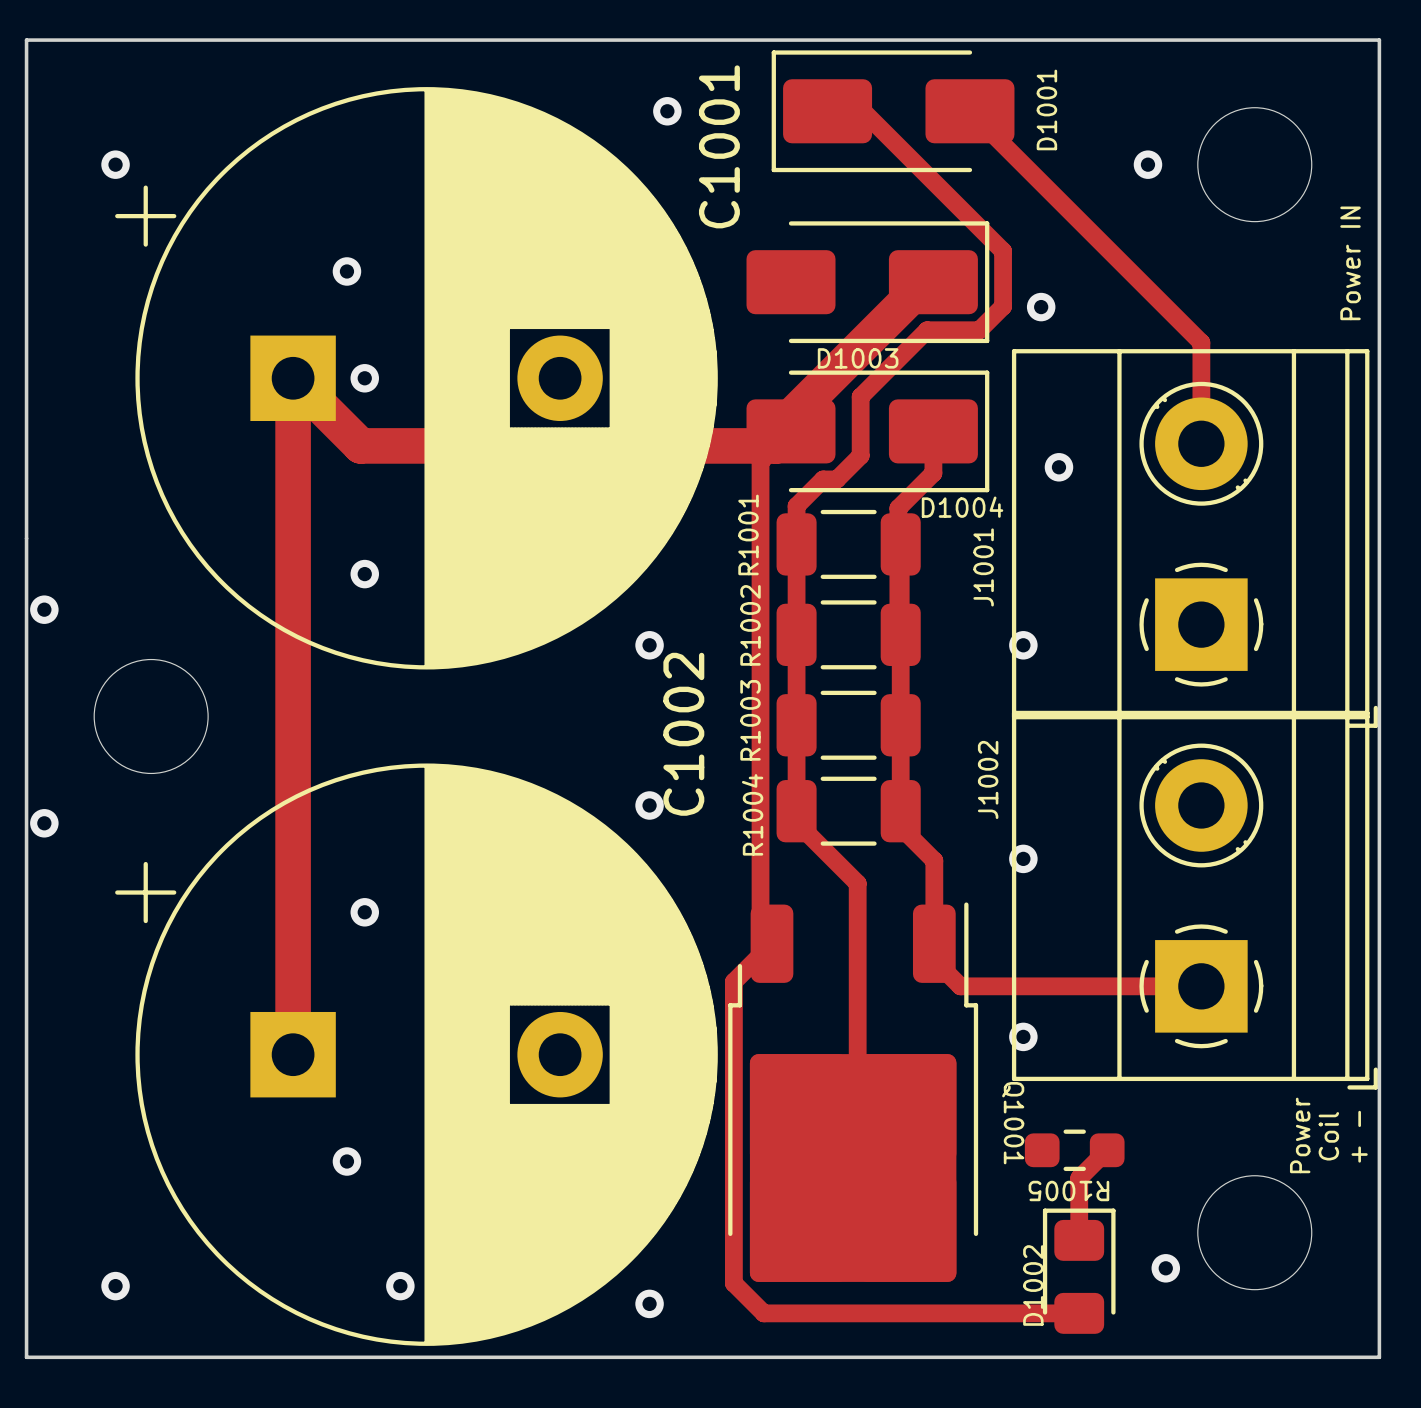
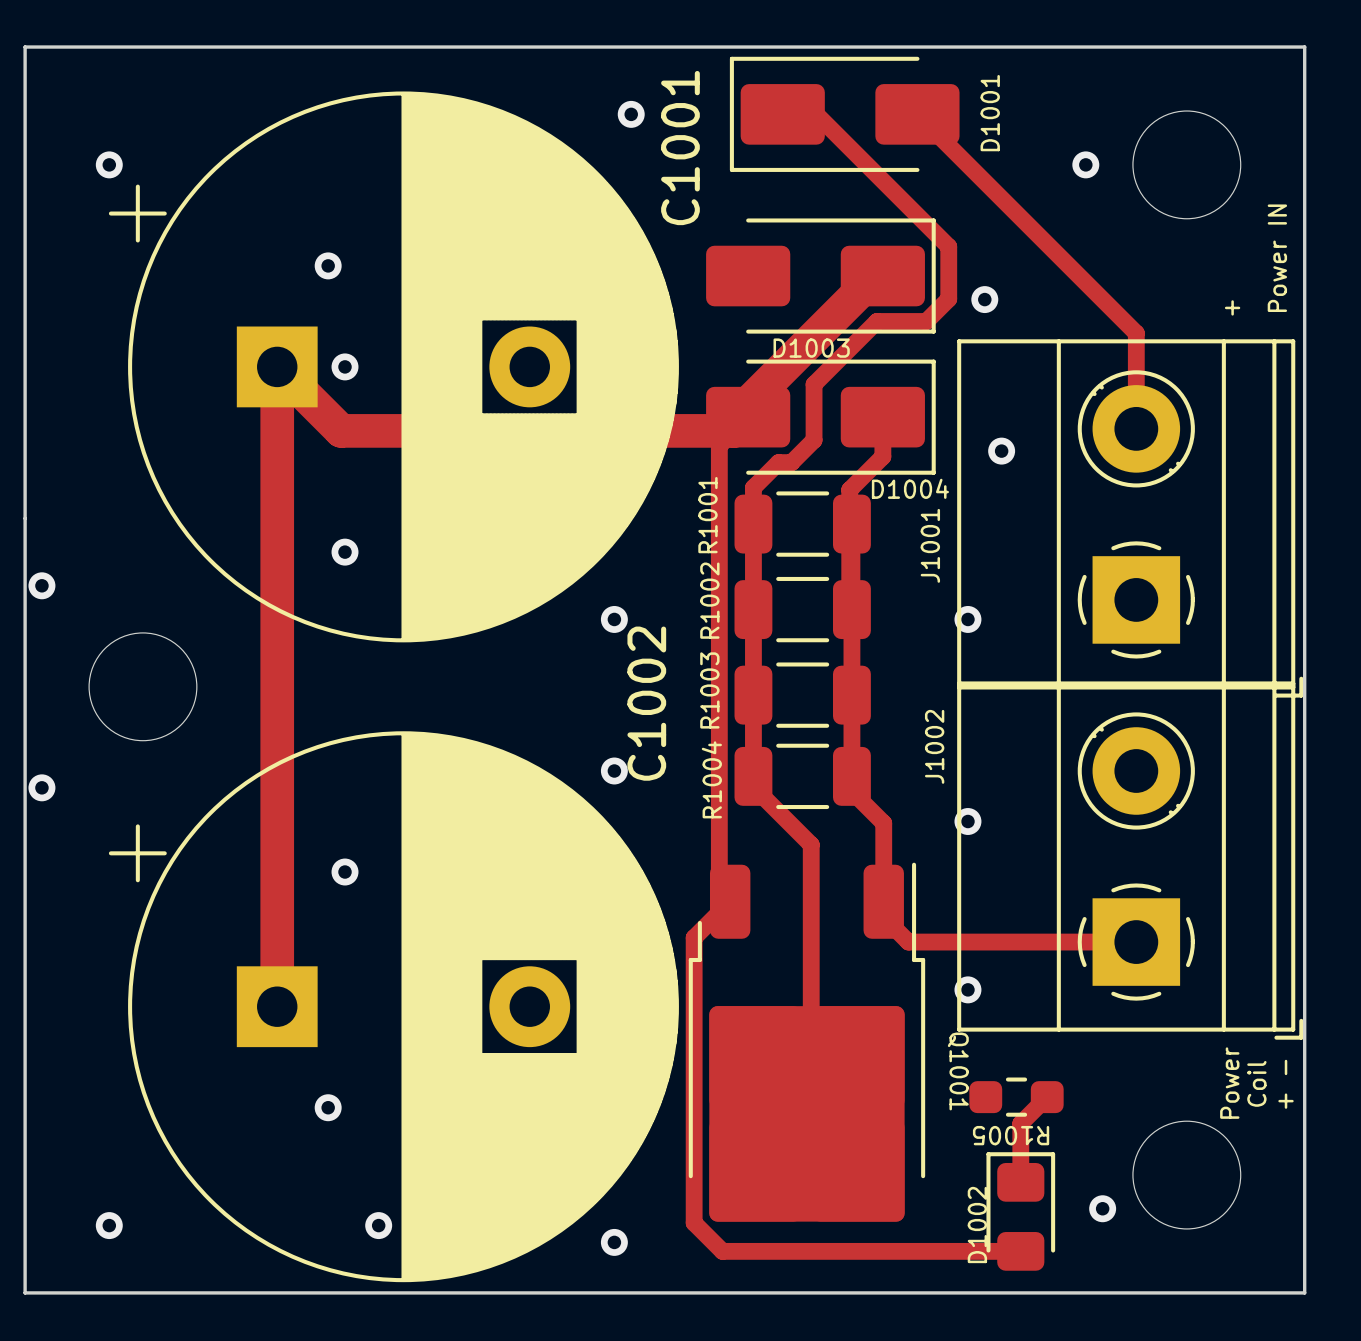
text: none -> + (1232, 307)

